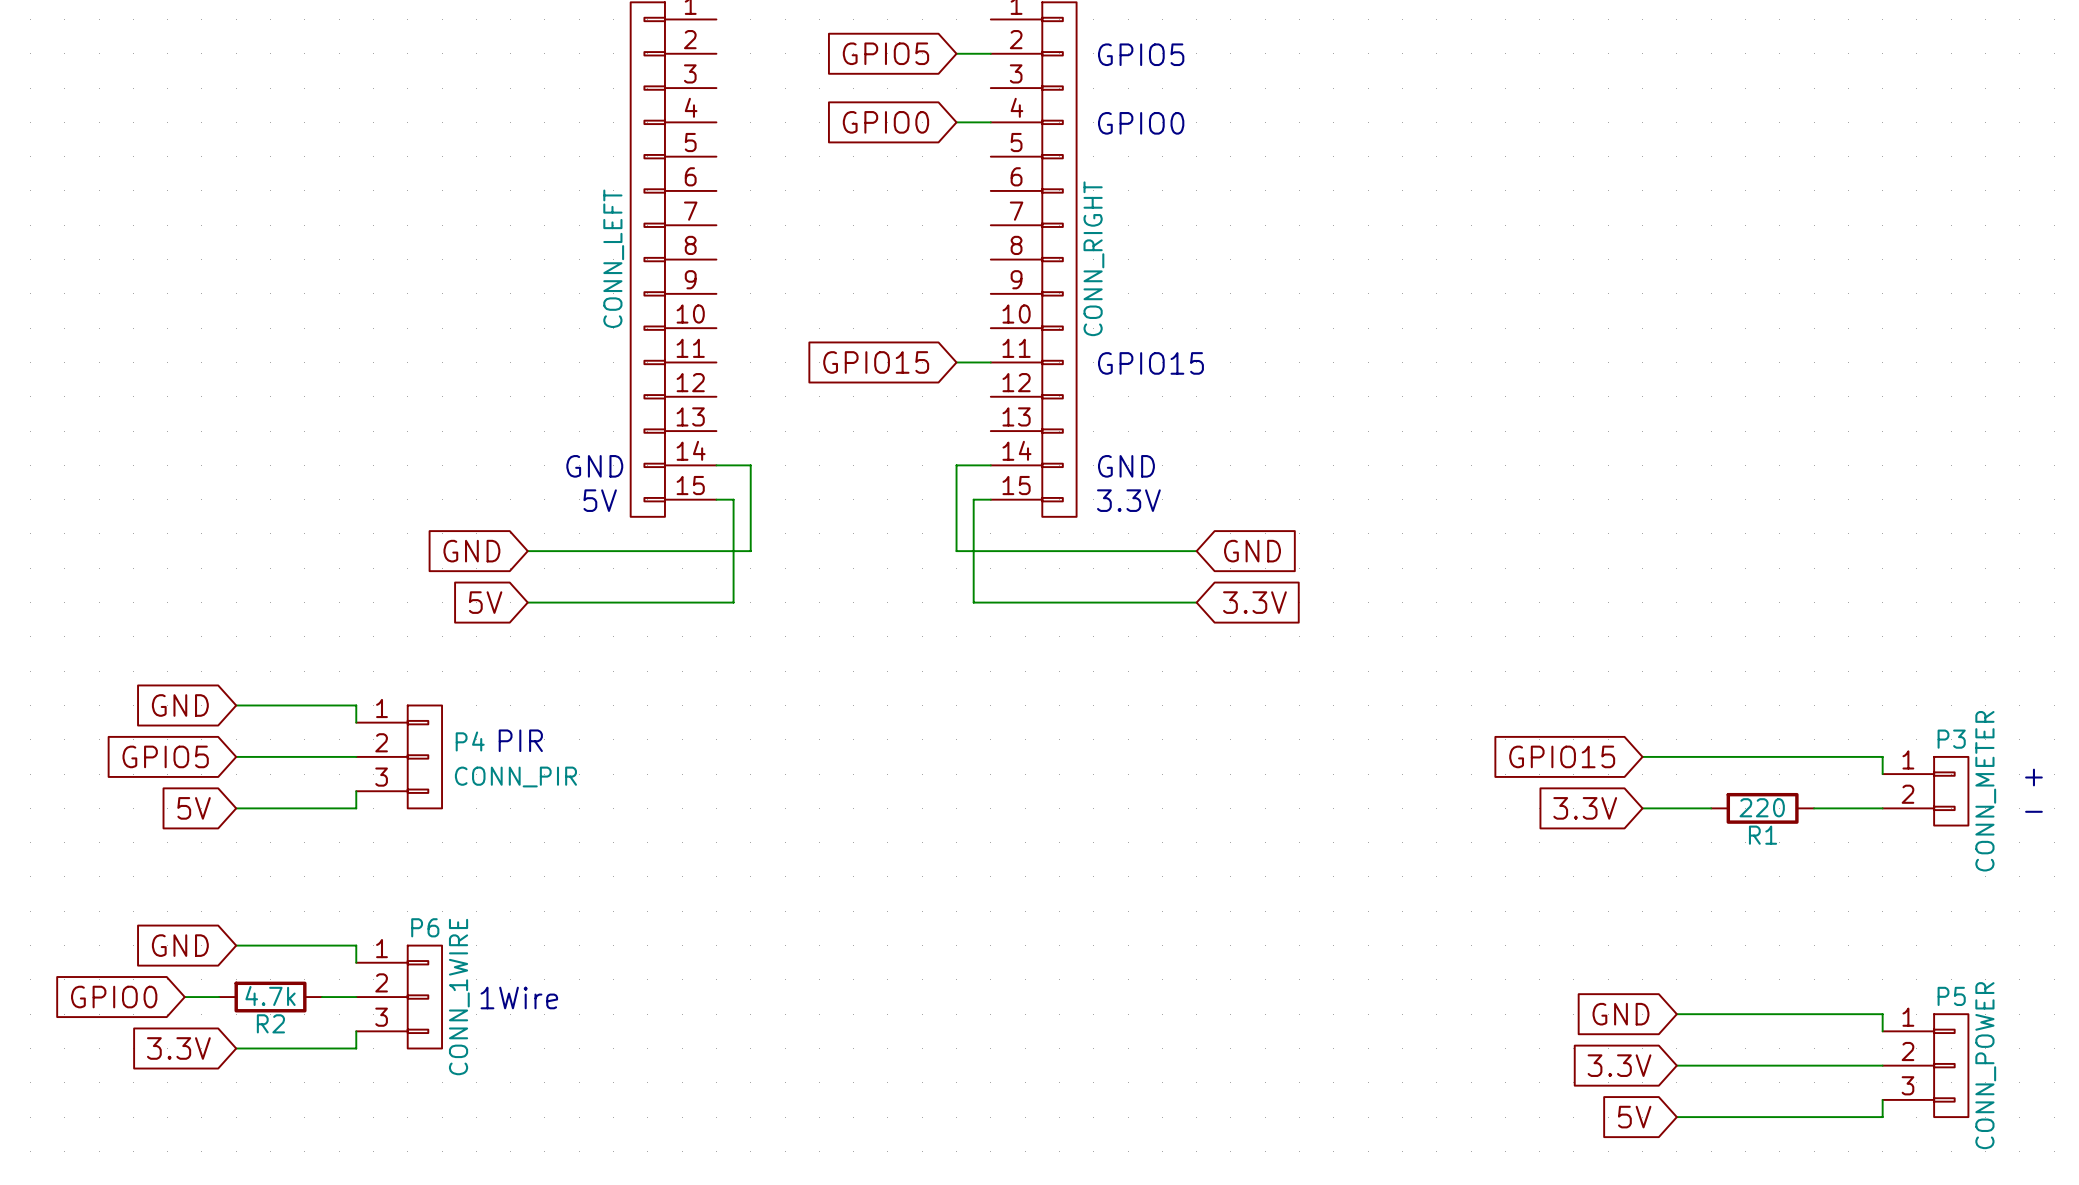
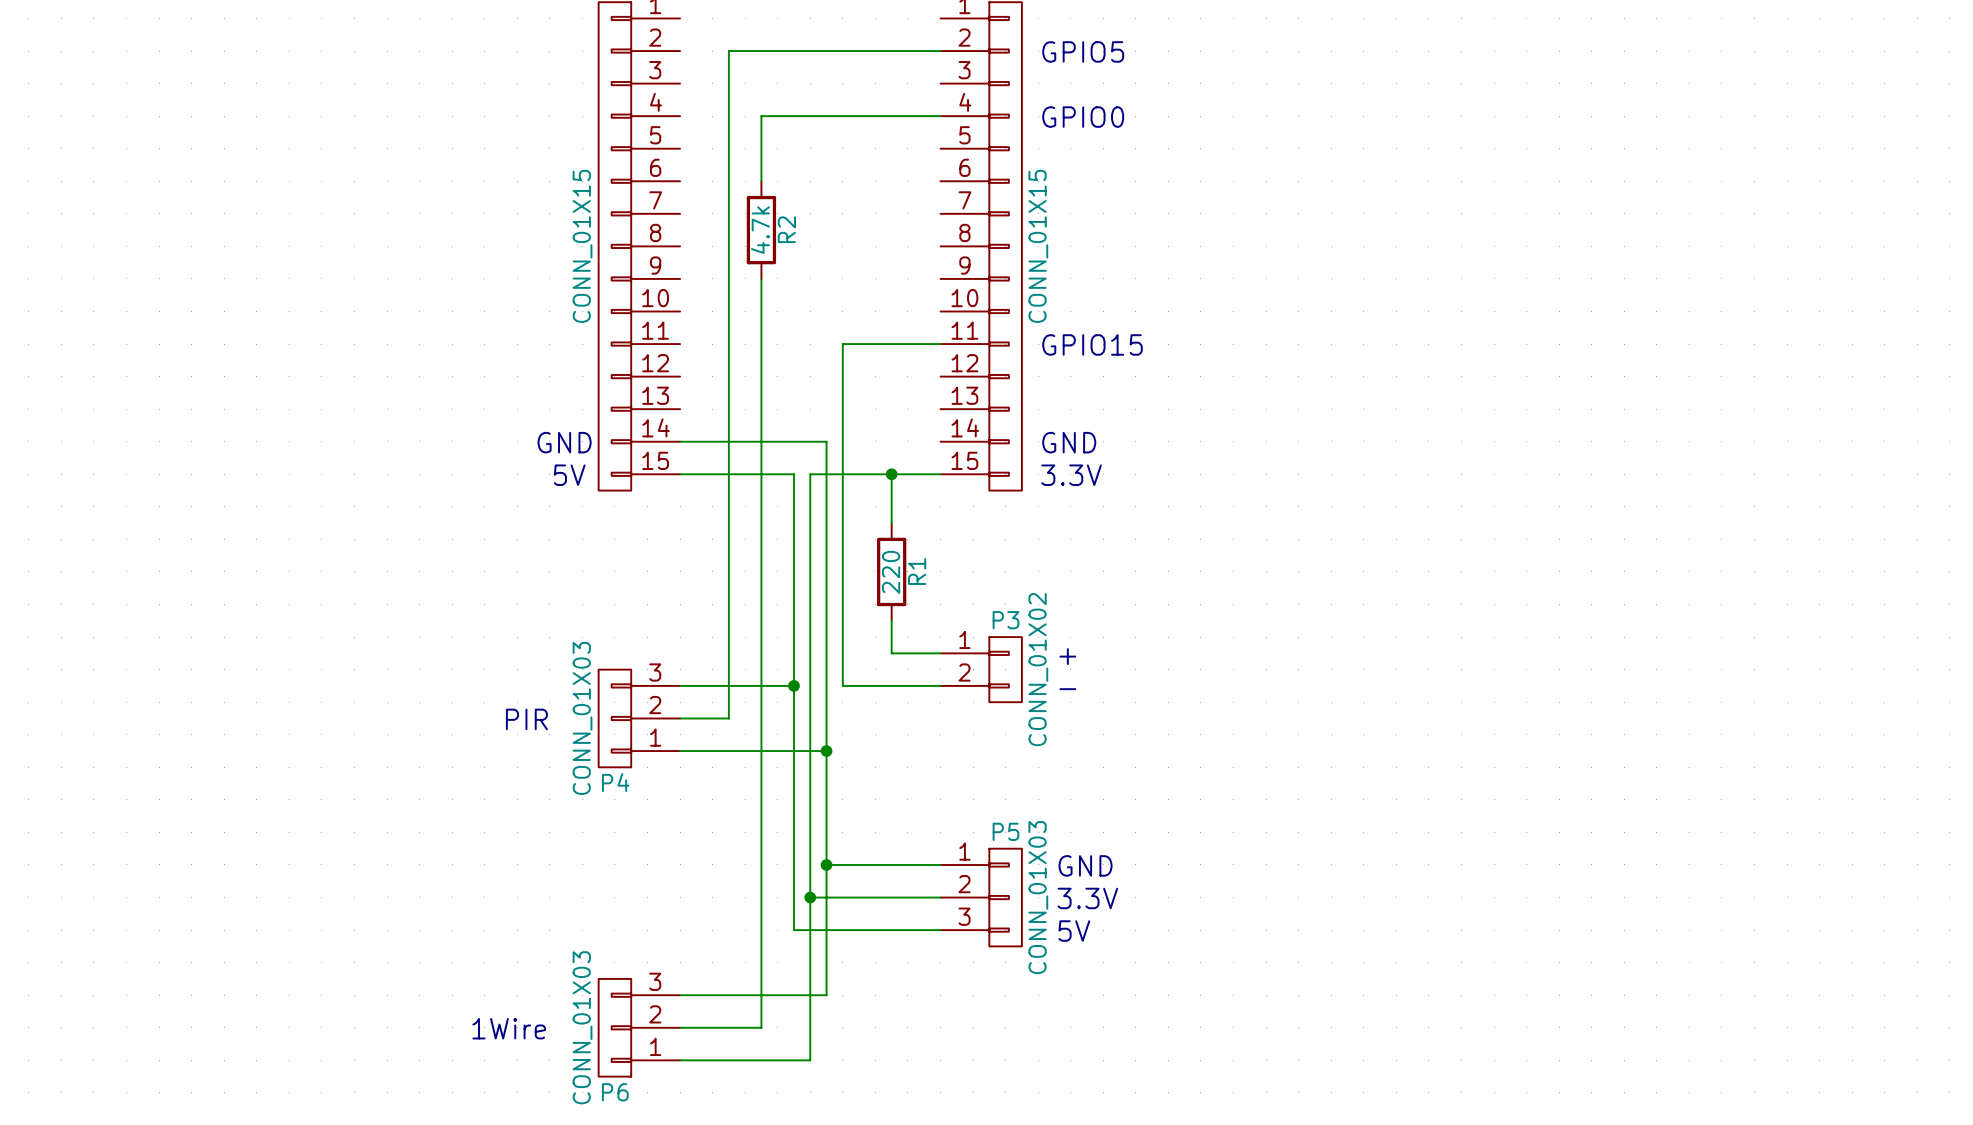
global label: GPIO5 (885, 53) -> none
wire: none -> (907, 51) (728, 51) (728, 718) (680, 718)
global label: GPIO0 (885, 122) -> none
wire: none -> (907, 116) (761, 116) (761, 181)
part value: CONN_LEFT (613, 258) -> CONN_01X15 (582, 246)
part value: CONN_RIGHT (1093, 258) -> CONN_01X15 (1038, 246)
wire: none -> (761, 278) (761, 1027) (680, 1027)
global label: GPIO15 (876, 362) -> none
wire: none -> (907, 344) (842, 344) (842, 685) (940, 685)
wire: (750, 465) (750, 551) (527, 551) -> (712, 441) (826, 441) (826, 995) (680, 995)
wire: (990, 465) (956, 465) (956, 551) (1196, 551) -> none
wire: (733, 499) (733, 602) (527, 602) -> (696, 474) (793, 474) (793, 930) (940, 930)
wire: none -> (891, 474) (891, 523)
junction: none -> (891, 474)
wire: (973, 499) (973, 602) (1196, 602) -> (924, 474) (810, 474) (810, 1060) (680, 1060)
global label: GND (471, 551) -> none
global label: GND (1252, 551) -> none
global label: 5V (485, 602) -> none
global label: 3.3V (1254, 602) -> none
wire: none -> (891, 620) (891, 653) (940, 653)
text: none -> + (1067, 656)
global label: GND (180, 705) -> none
wire: (236, 705) (356, 705) (356, 722) -> none
wire: none -> (680, 685) (793, 685)
junction: none -> (793, 685)
text: none -> - (1067, 689)
text position: PIR (520, 740) -> PIR (526, 719)
P4 name position: P4 (470, 741) -> P4 (615, 782)
global label: GPIO5 (165, 756) -> none
wire: (236, 756) (356, 756) -> none
P4 position: (399, 756) -> (639, 718)
P4 rotation: 0° (424, 756) -> 180° (614, 718)
global label: GPIO15 (1562, 756) -> none
wire: (1642, 756) (1882, 756) (1882, 774) -> none
P4 value: CONN_PIR (515, 777) -> CONN_01X03 (582, 718)
text: + (2033, 777) -> none
wire: (356, 791) (356, 808) (236, 808) -> none
wire: none -> (680, 751) (826, 751)
junction: none -> (826, 751)
P3 position: (1925, 791) -> (981, 669)
P3 value: CONN_METER (1985, 791) -> CONN_01X02 (1038, 669)
global label: 5V (194, 808) -> none
global label: 3.3V (1585, 808) -> none
wire: (1642, 808) (1711, 808) -> none
R1 rotation: 0° (1762, 808) -> 90° clockwise (891, 571)
R1 position: (1762, 808) -> (891, 571)
wire: (1814, 808) (1882, 808) -> none
text: - (2033, 811) -> none
R1 name position: R1 (1763, 835) -> R1 (917, 571)
wire: none -> (826, 864) (940, 864)
junction: none -> (826, 864)
text: none -> GND (1085, 865)
global label: GND (180, 945) -> none
wire: (236, 945) (356, 945) (356, 962) -> none
wire: none -> (810, 897) (940, 897)
junction: none -> (810, 897)
text: none -> 3.3V (1087, 898)
text: none -> 5V (1074, 931)
global label: GPIO0 (114, 997) -> none
wire: (184, 997) (219, 997) -> none
R2 rotation: 0° (270, 997) -> 90° clockwise (761, 230)
R2 position: (270, 997) -> (761, 230)
wire: (321, 997) (356, 997) -> none
P6 position: (399, 997) -> (639, 1027)
P6 rotation: 0° (424, 997) -> 180° (614, 1027)
P6 value: CONN_1WIRE (459, 997) -> CONN_01X03 (582, 1027)
text position: 1Wire (519, 998) -> 1Wire (509, 1028)
global label: GND (1620, 1014) -> none
wire: (1676, 1014) (1882, 1014) (1882, 1031) -> none
R2 name position: R2 (270, 1023) -> R2 (786, 229)
wire: (356, 1031) (356, 1048) (236, 1048) -> none
global label: 3.3V (178, 1048) -> none
global label: 3.3V (1619, 1065) -> none
wire: (1676, 1065) (1882, 1065) -> none
P5 position: (1925, 1065) -> (981, 897)
P5 value: CONN_POWER (1985, 1065) -> CONN_01X03 (1038, 897)
wire: (1882, 1099) (1882, 1117) (1676, 1117) -> none
global label: 5V (1634, 1117) -> none

